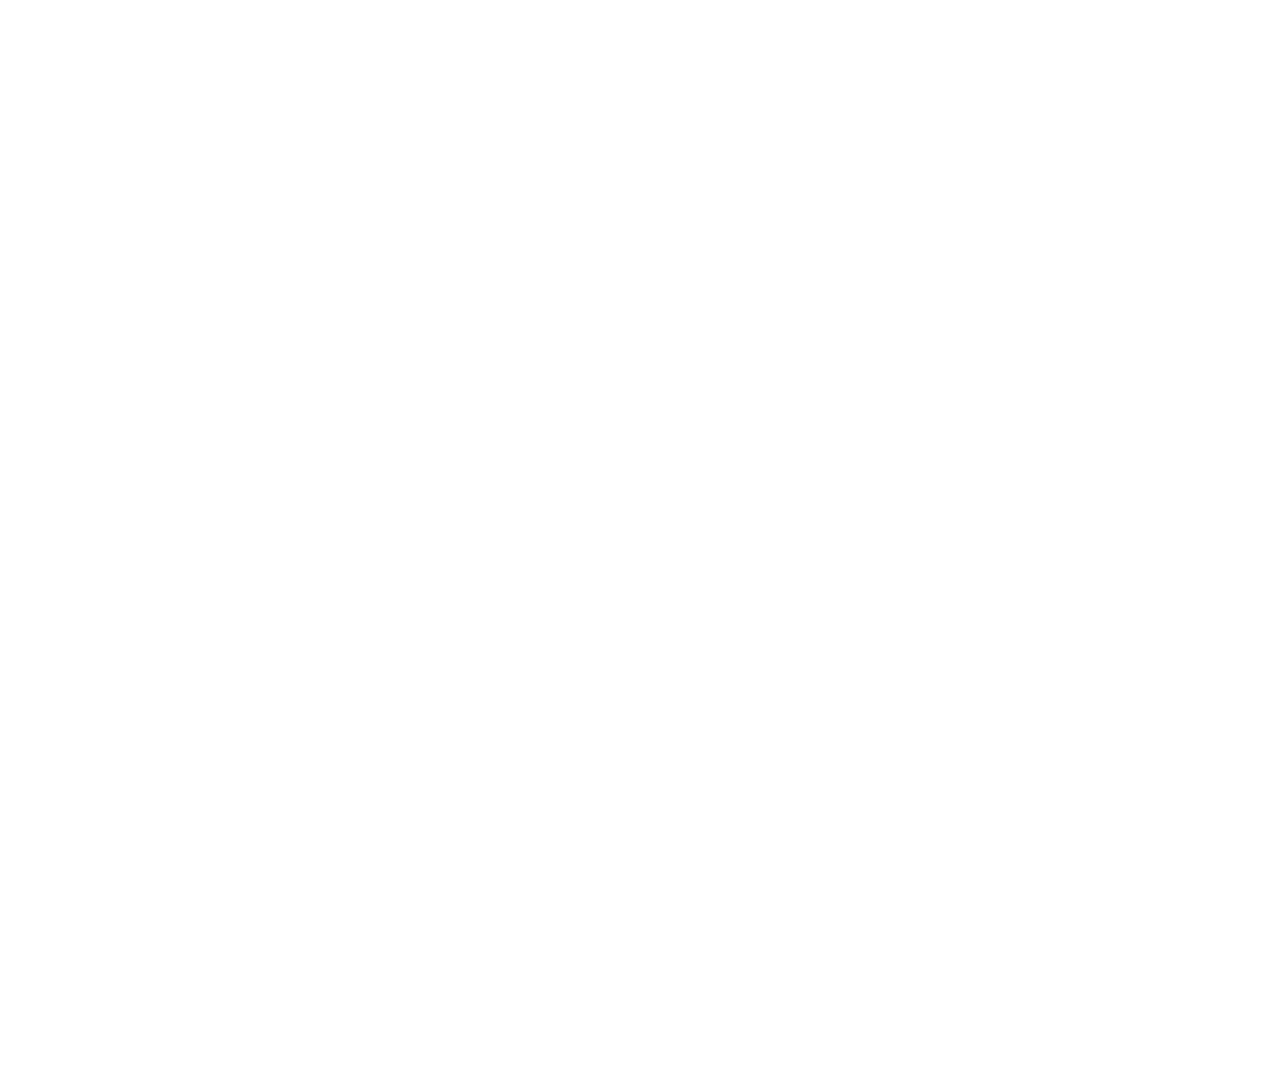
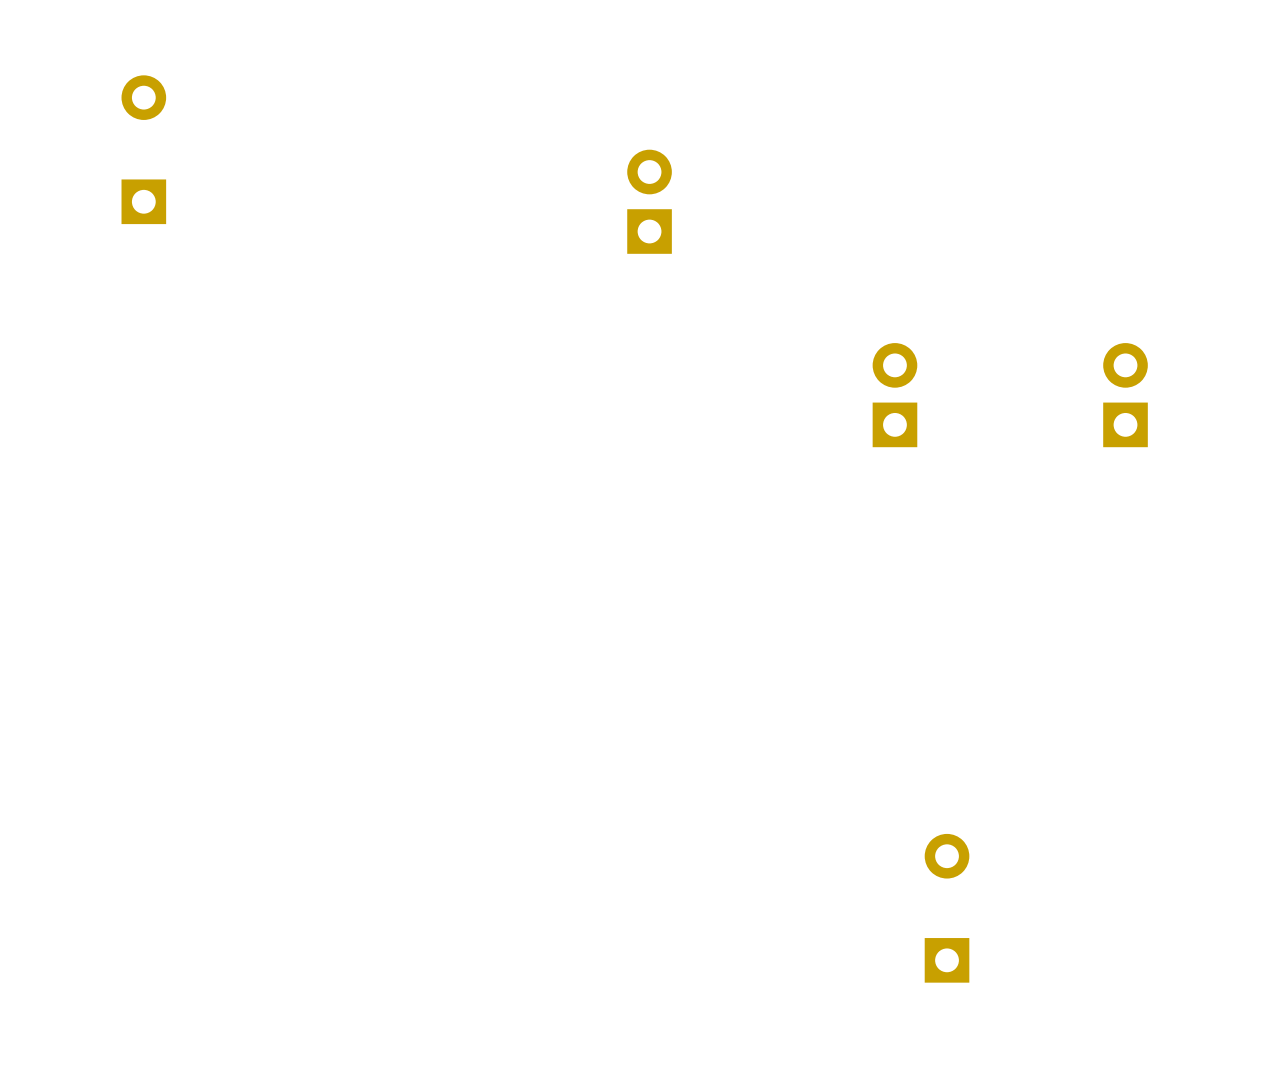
part: none -> (143, 149)
part: none -> (649, 201)
part: none -> (894, 395)
part: none -> (1125, 395)
part: none -> (947, 908)

